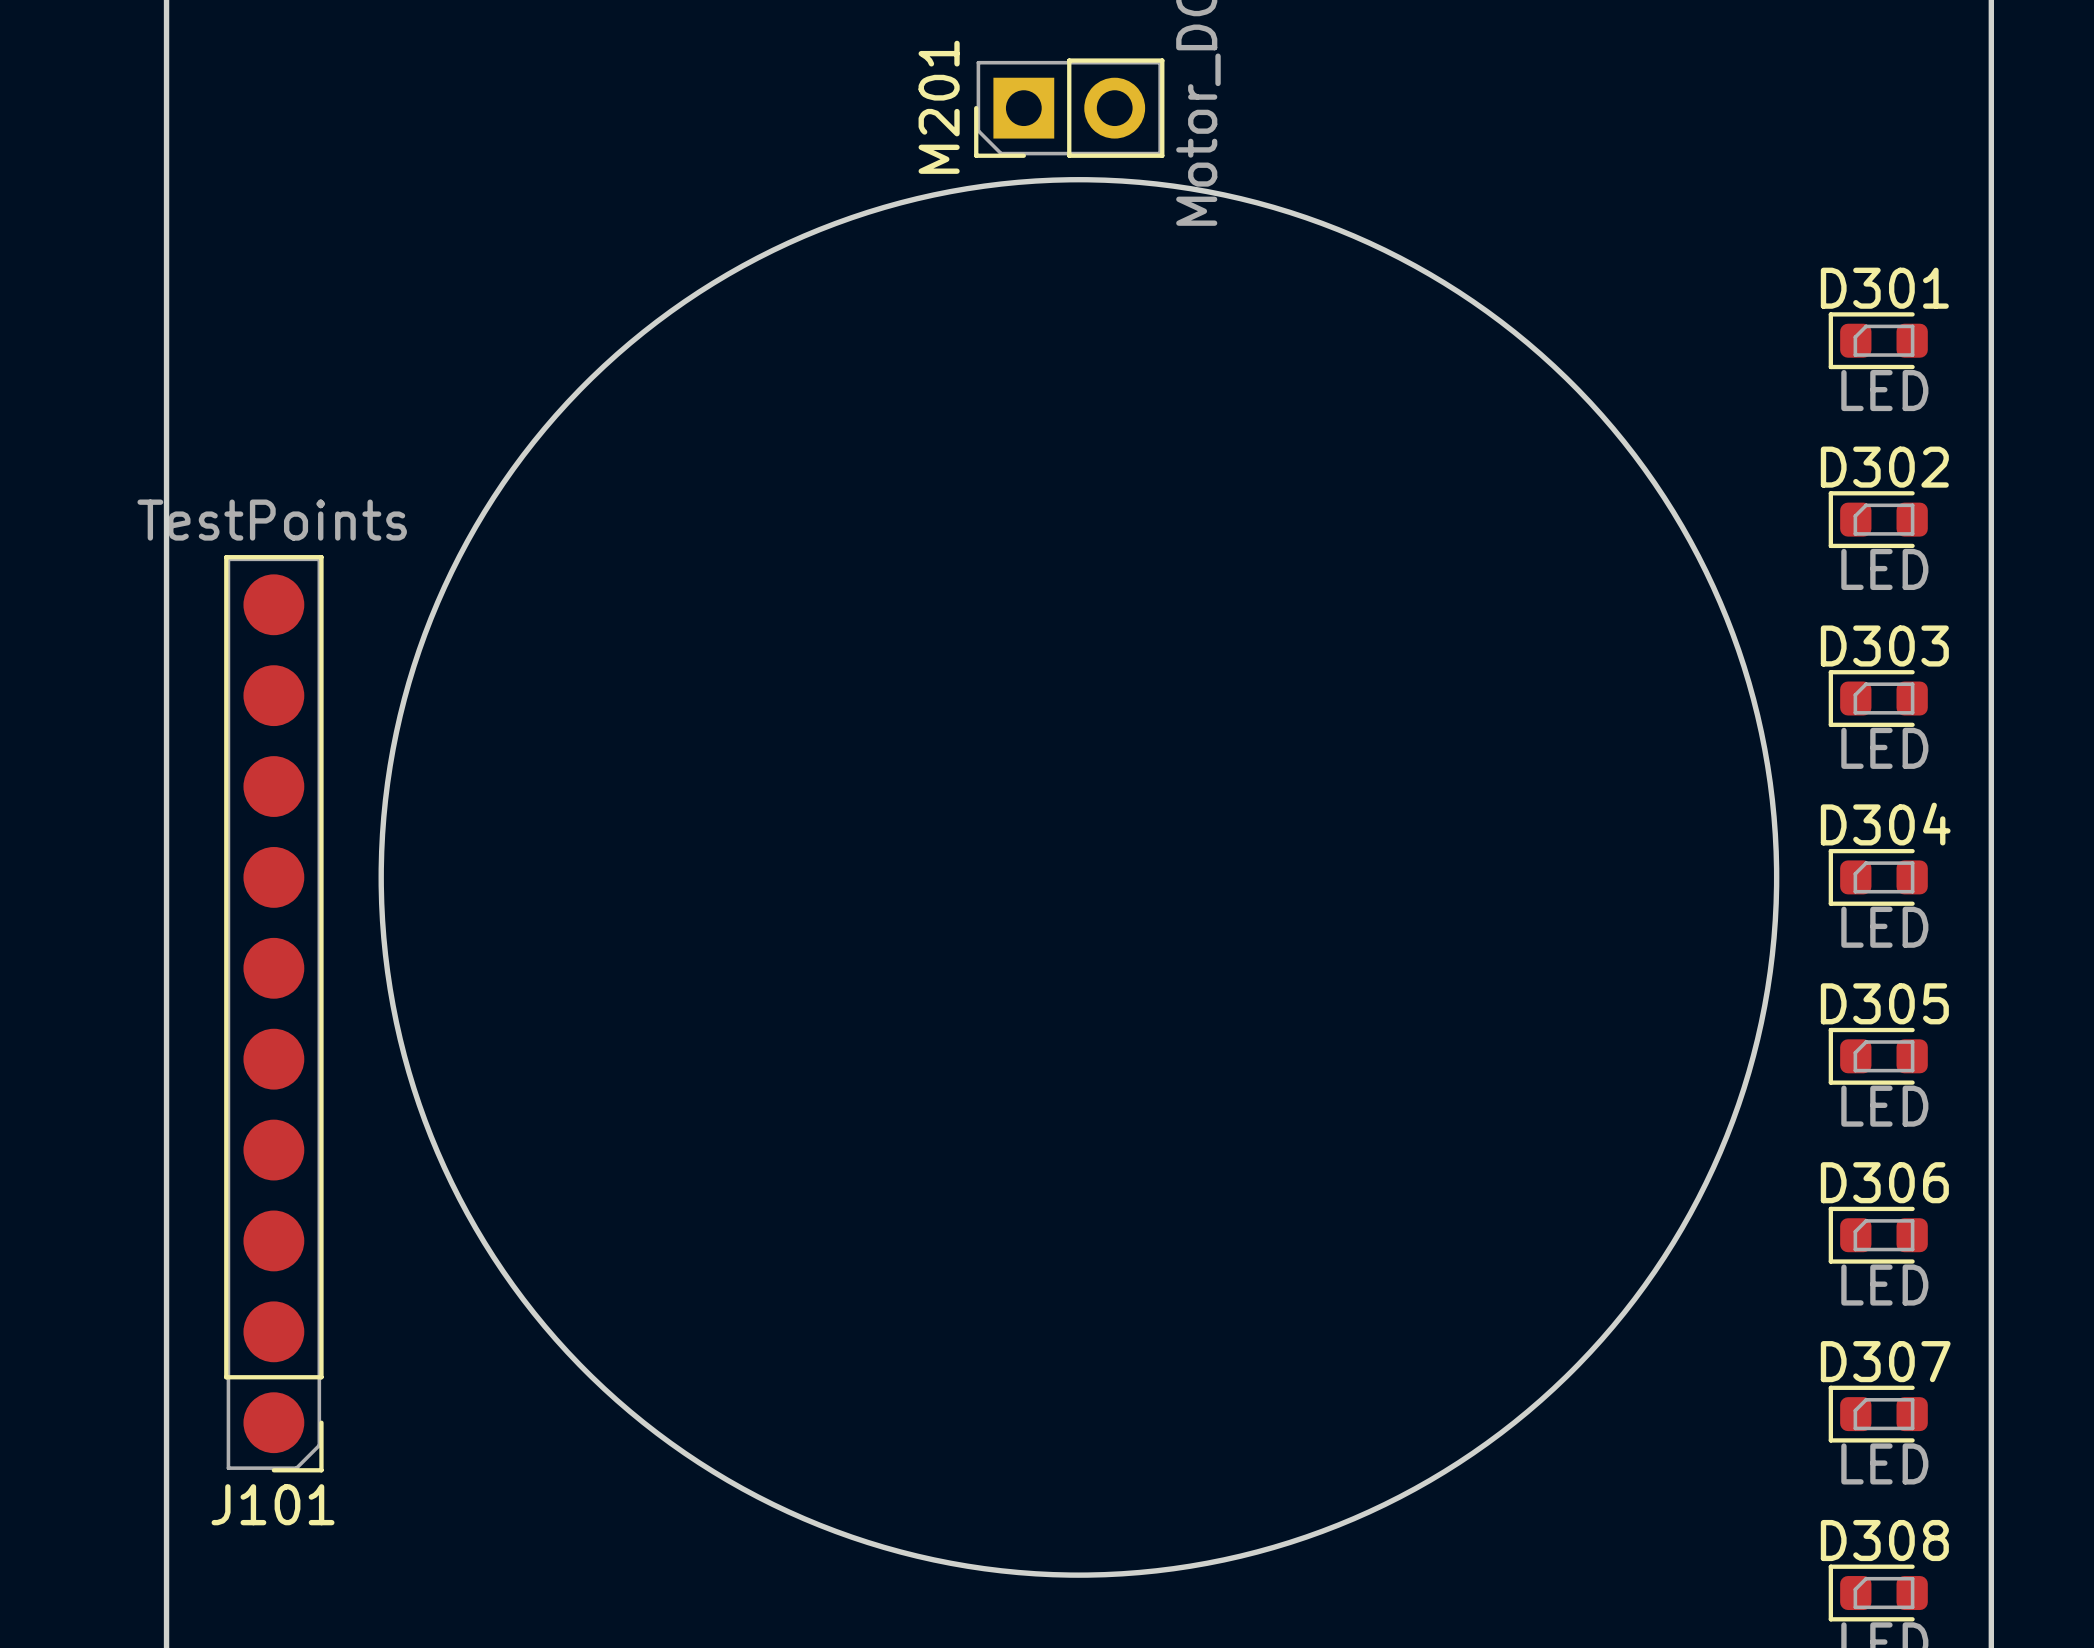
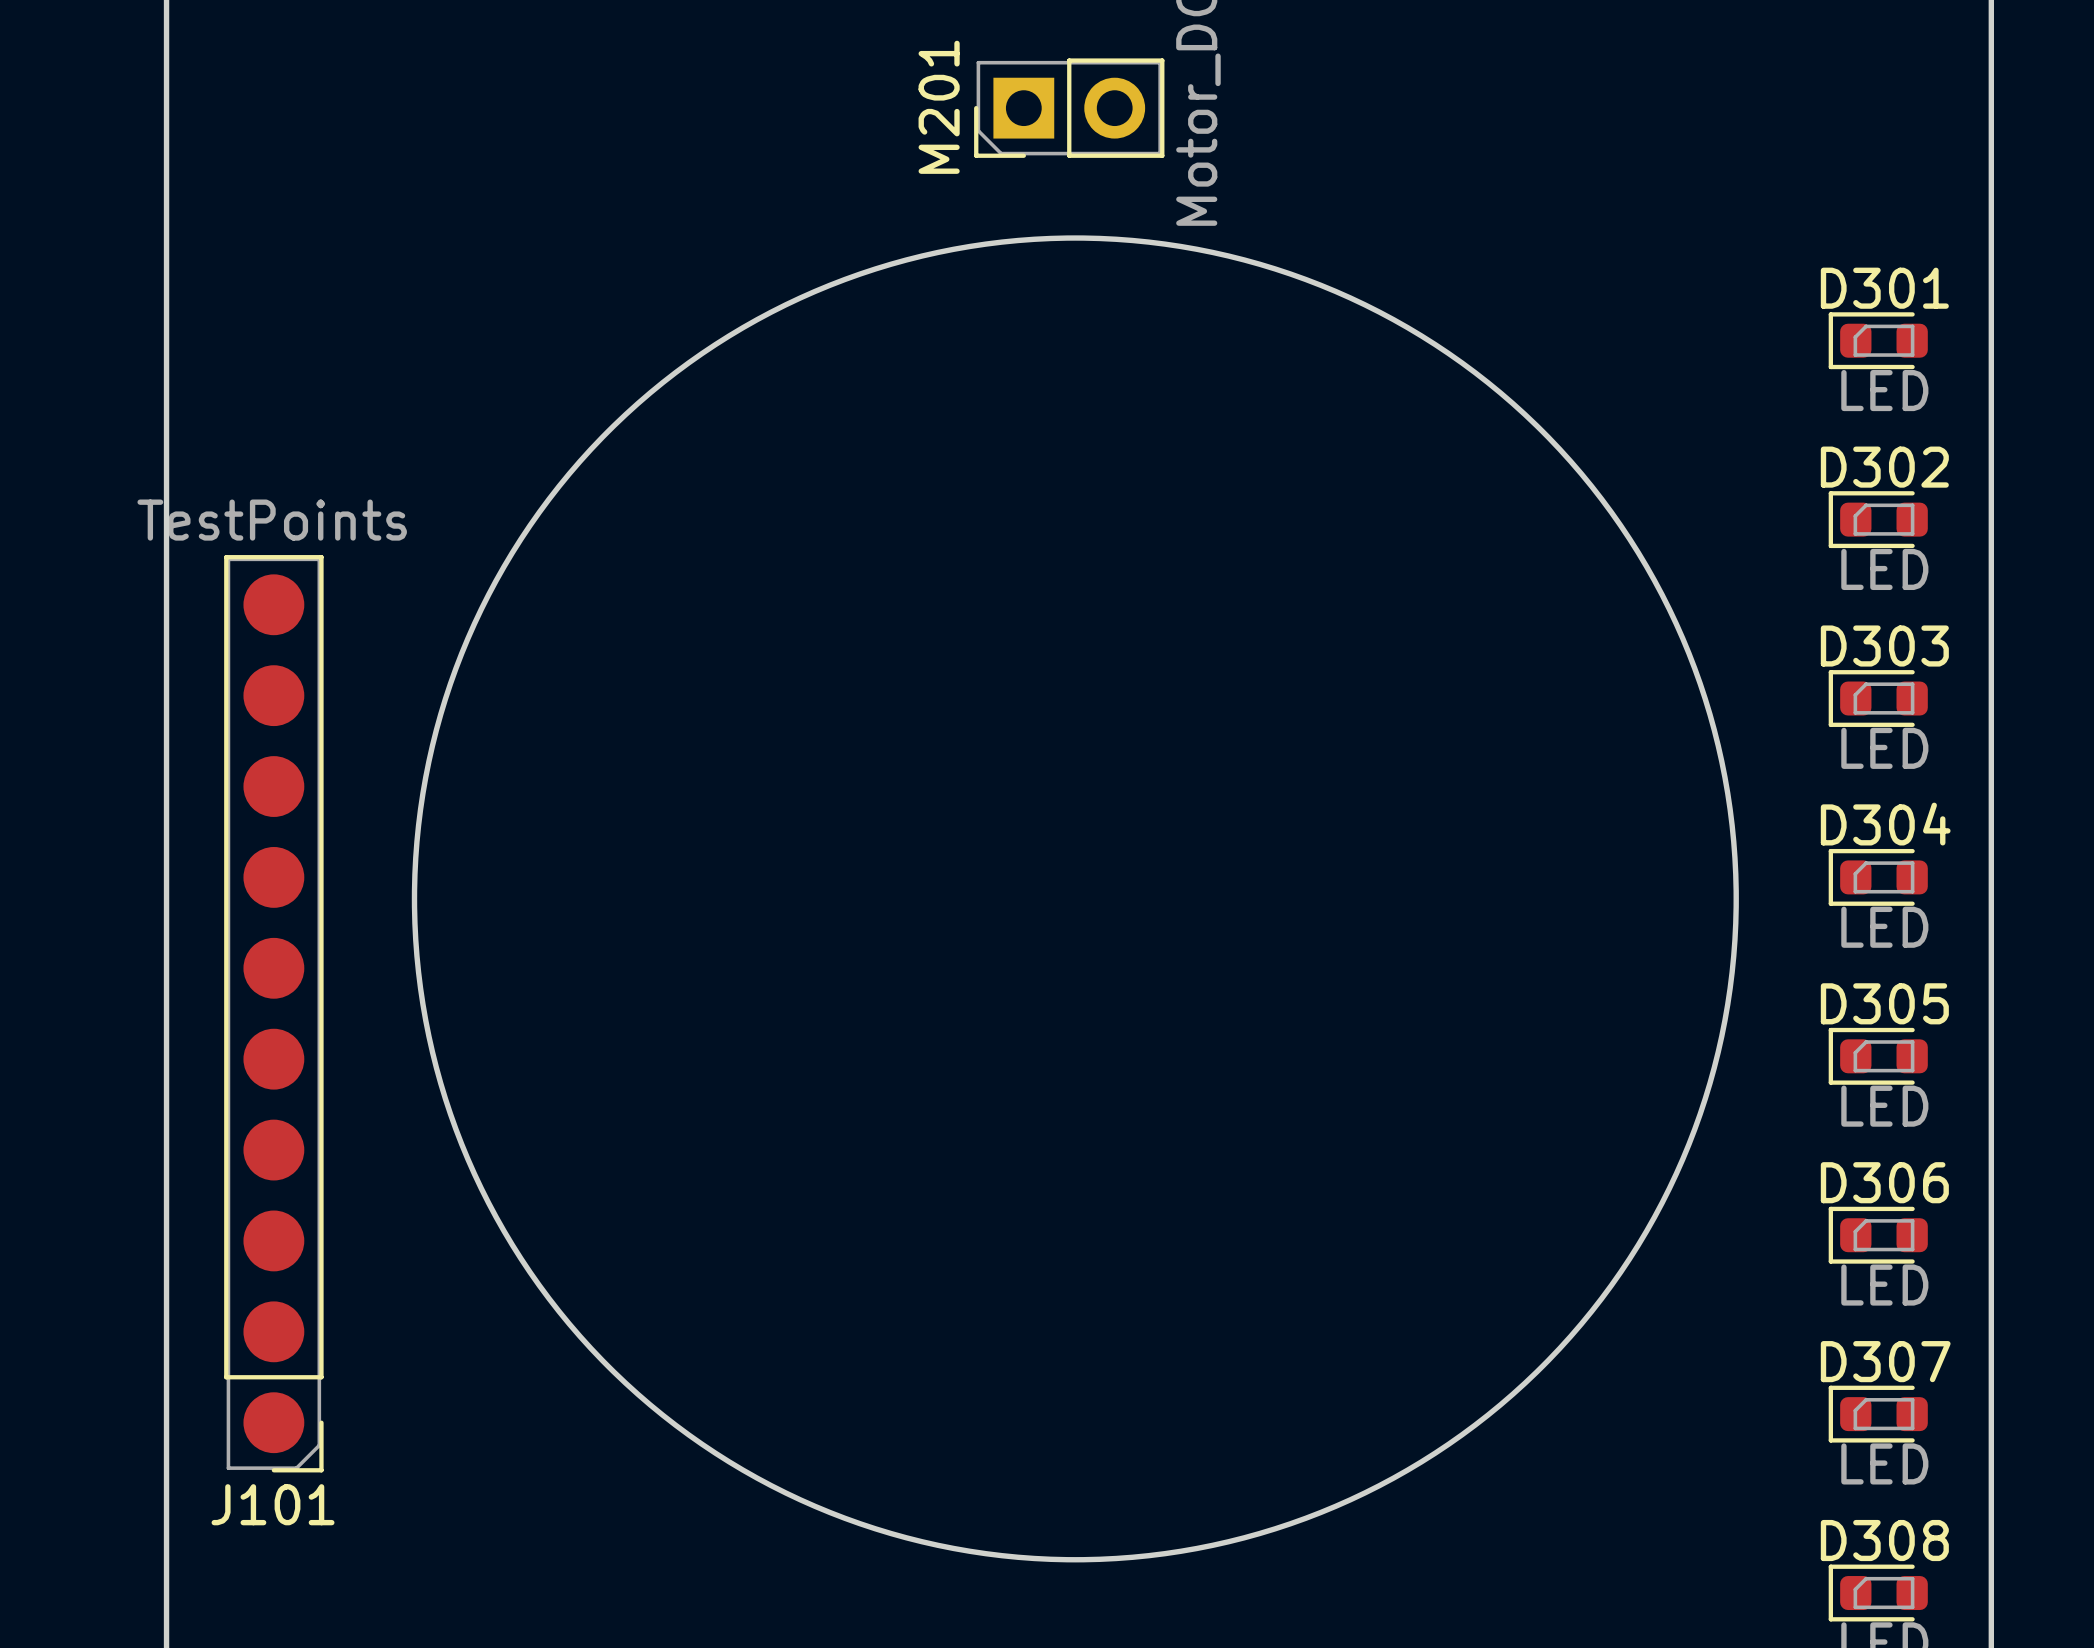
round board edge size: [378, 177, 1780, 1578] -> [411, 235, 1739, 1563]

